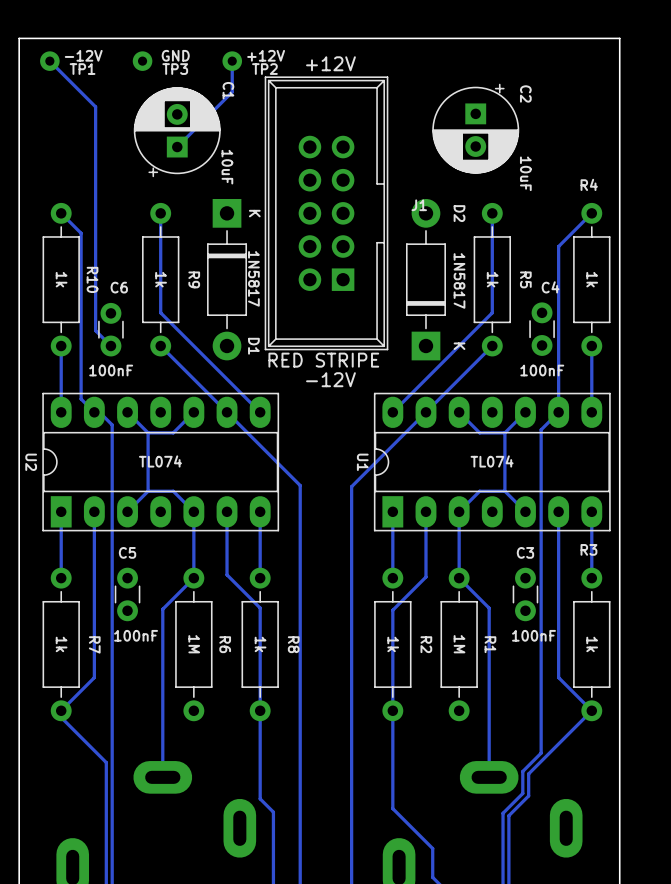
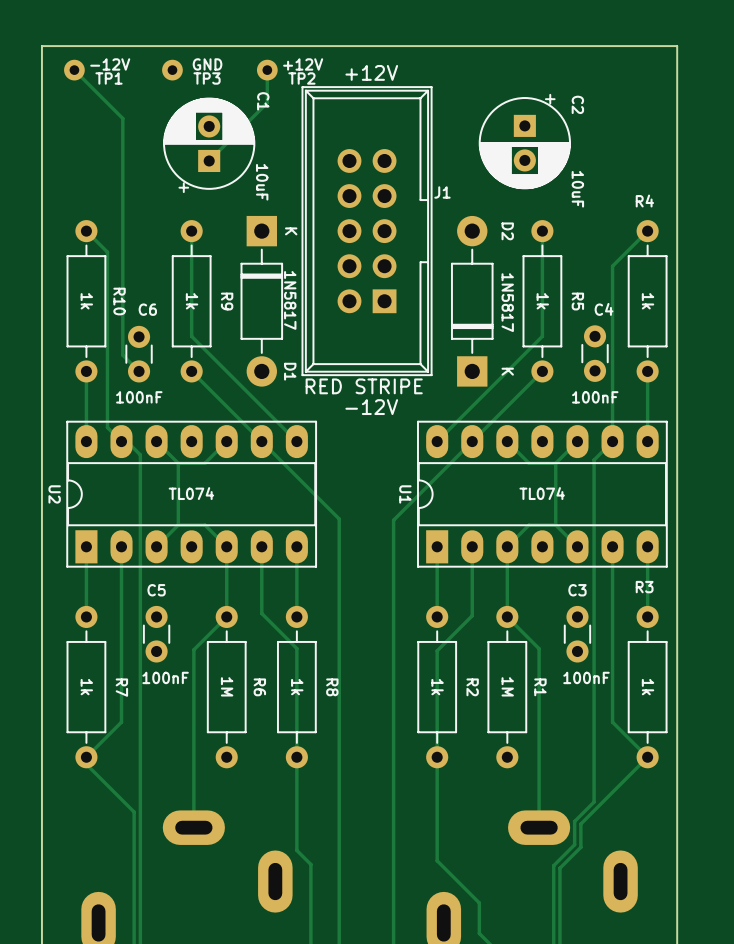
J1 name position: J1 (419, 205) -> J1 (442, 192)

